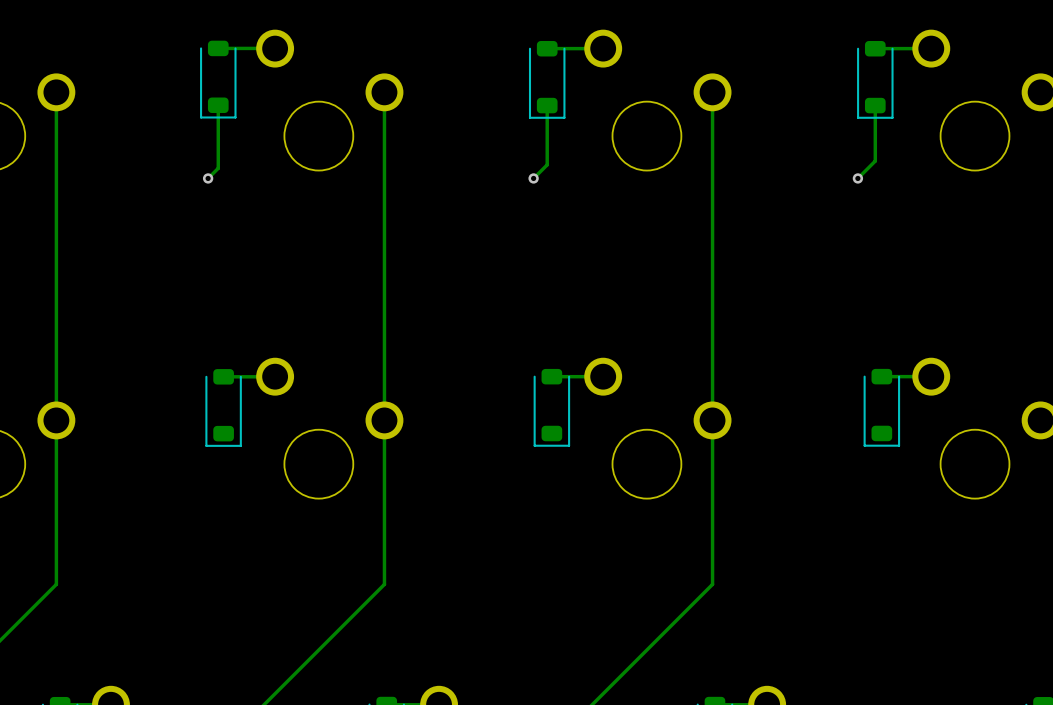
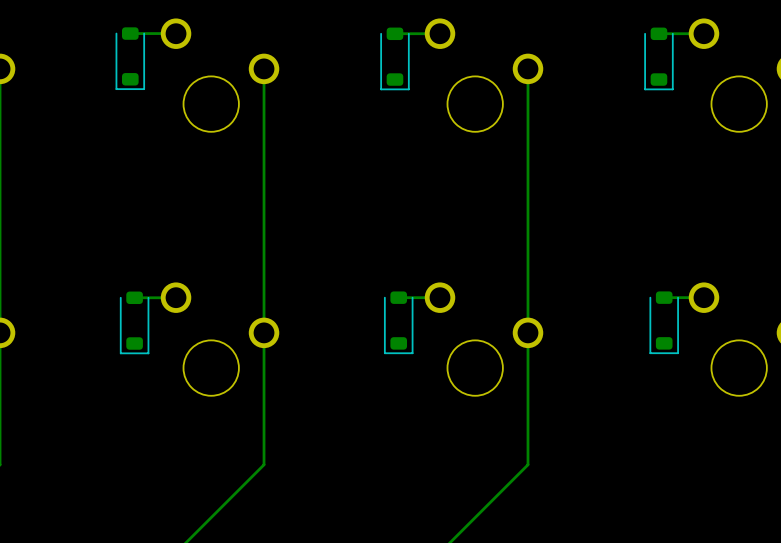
track: (218, 105) (218, 168) (208, 178) -> none
track: (547, 105) (547, 164) (533, 178) -> none
track: (875, 105) (875, 161) (857, 178) -> none
via: (208, 178) -> none
via: (533, 178) -> none
via: (857, 178) -> none

